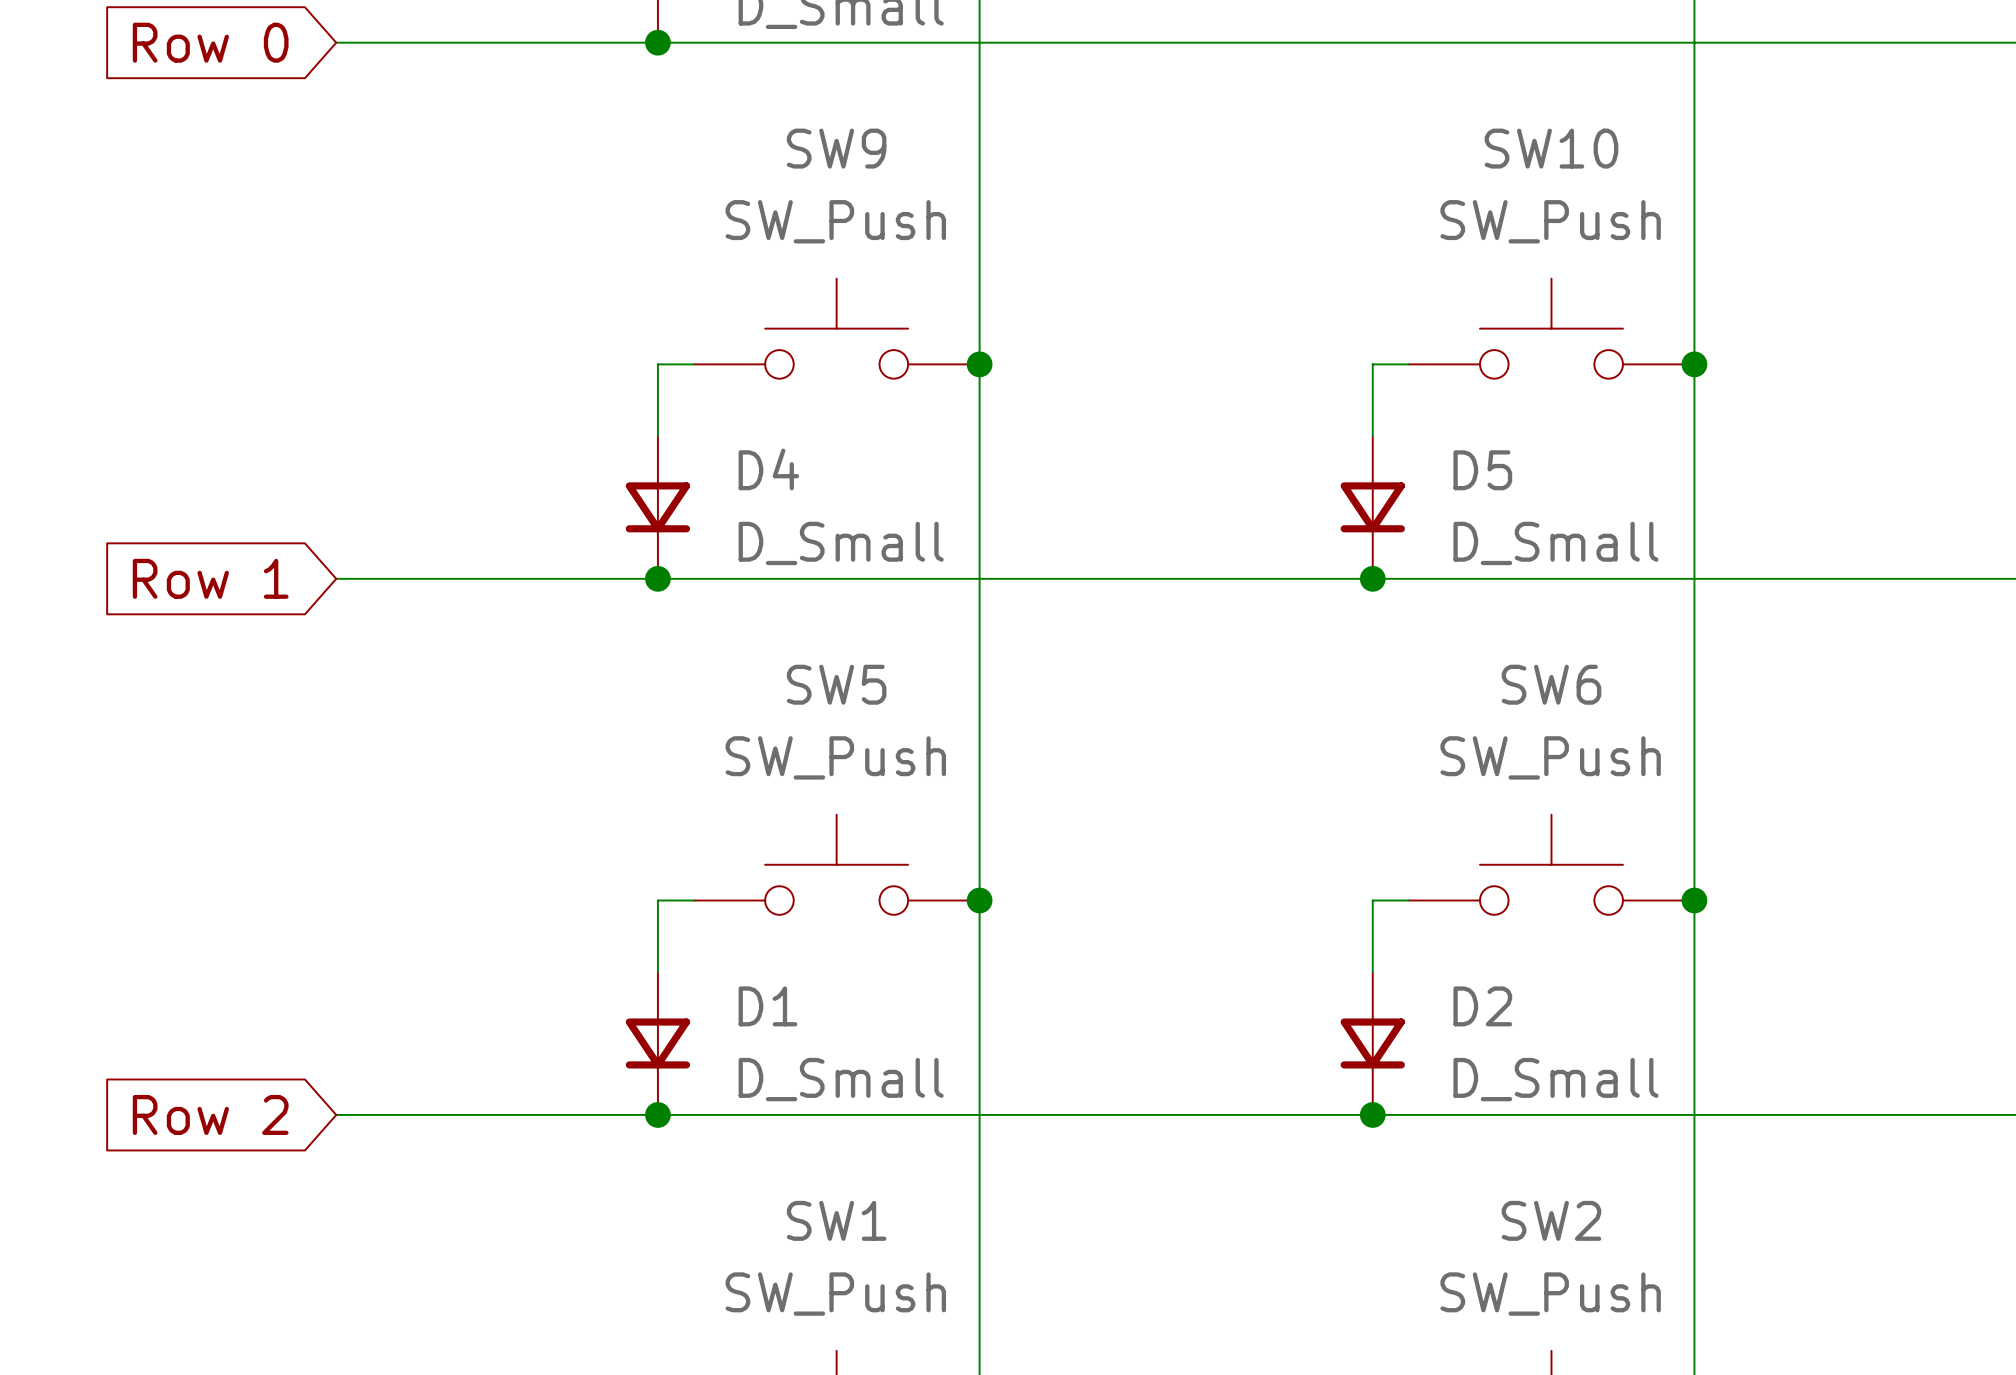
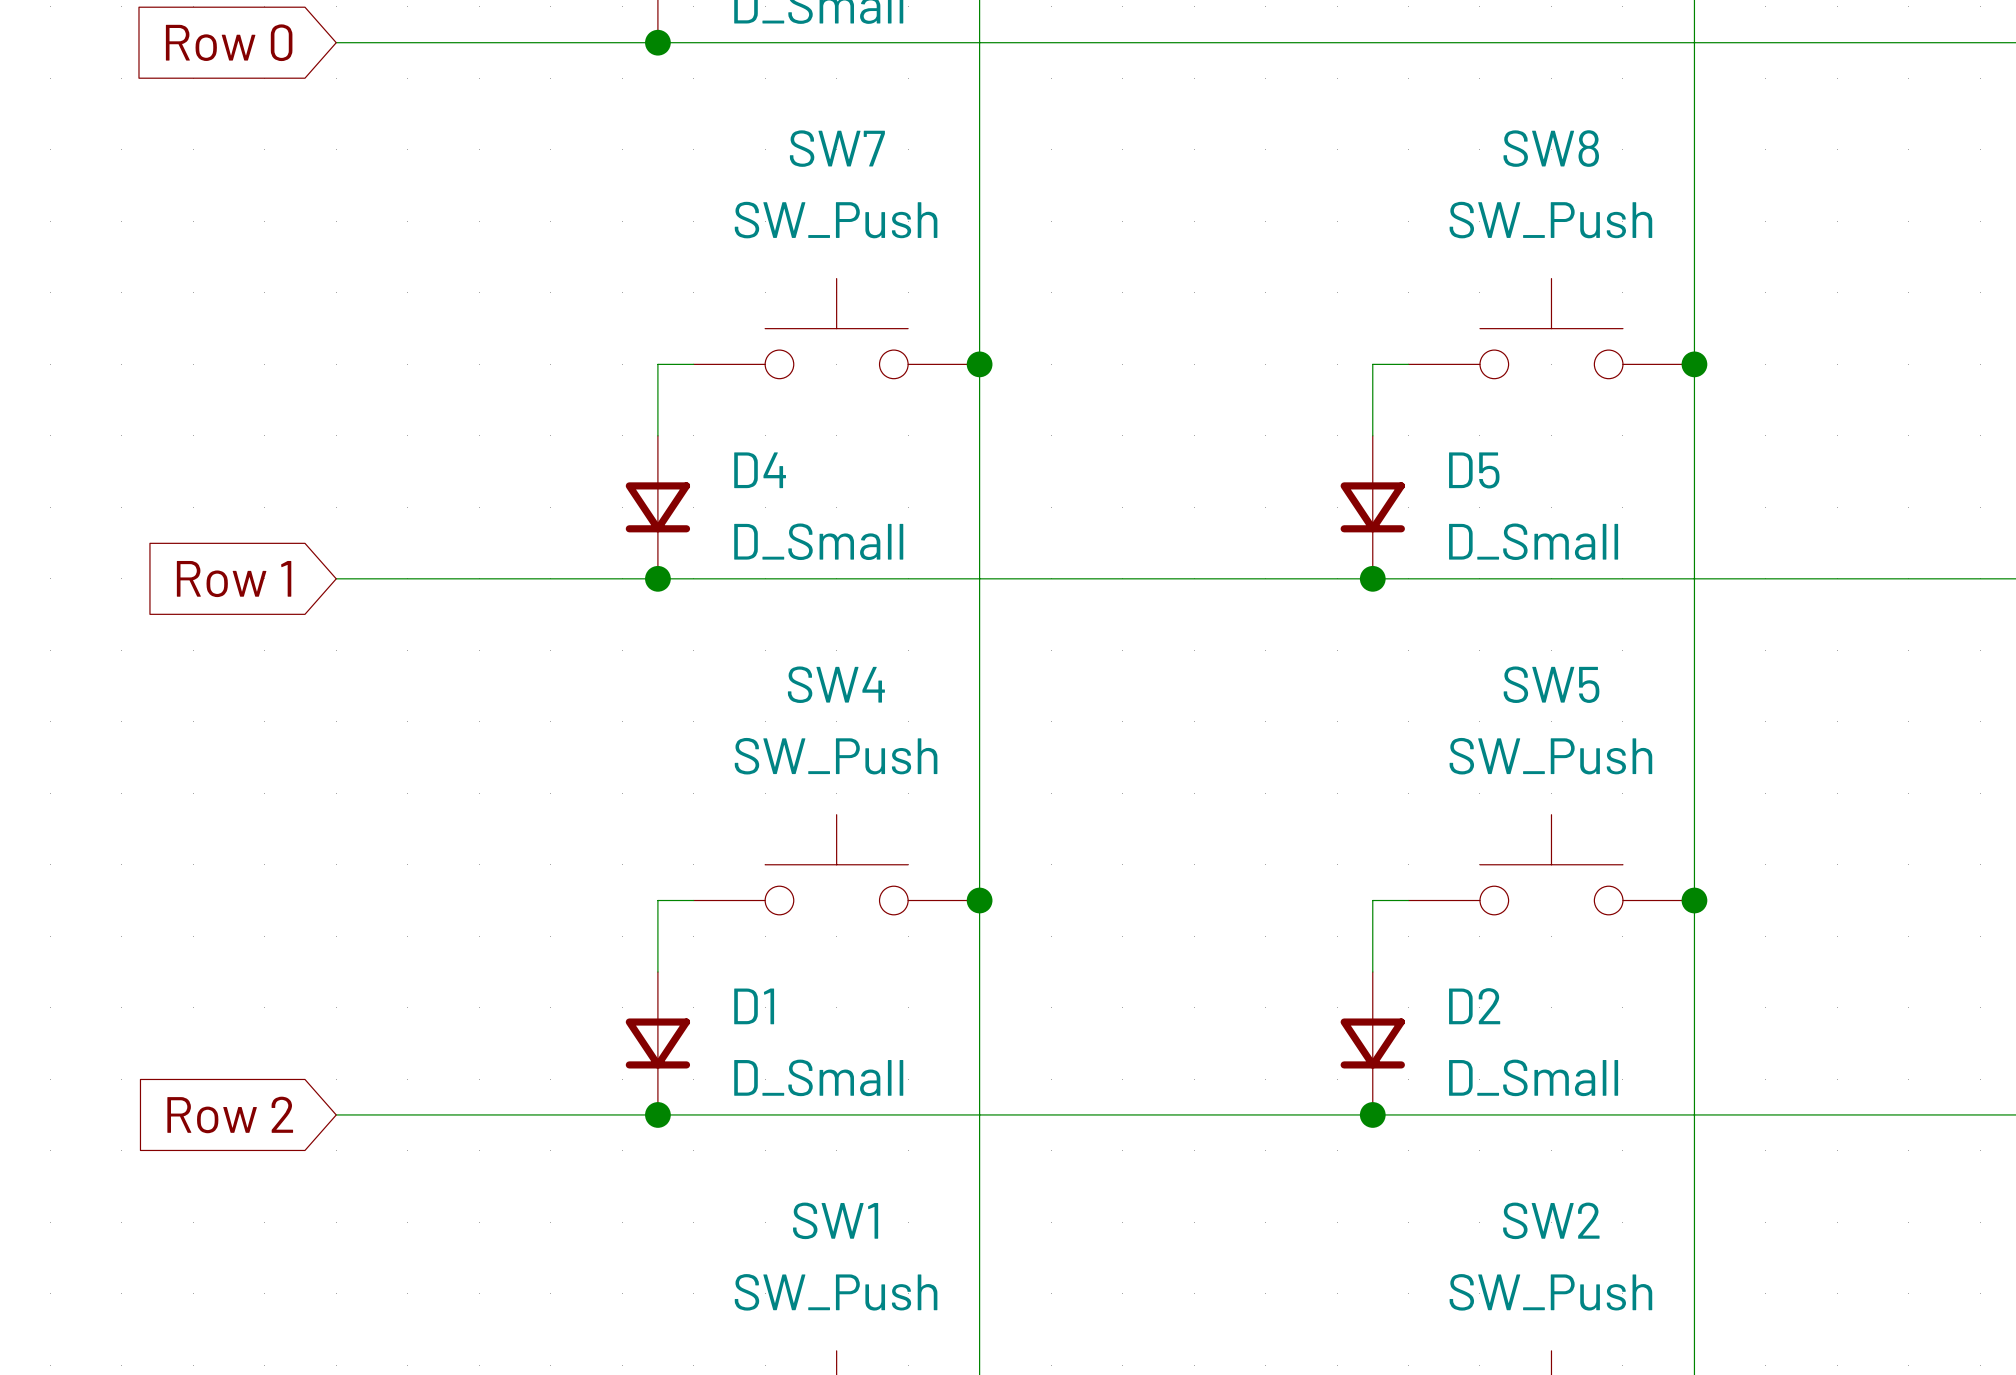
SW9 name: SW9 (836, 148) -> SW7 (837, 148)
SW10 name: SW10 (1551, 148) -> SW8 (1551, 148)
SW5 name: SW5 (836, 684) -> SW4 (836, 684)
SW6 name: SW6 (1551, 684) -> SW5 (1551, 684)

